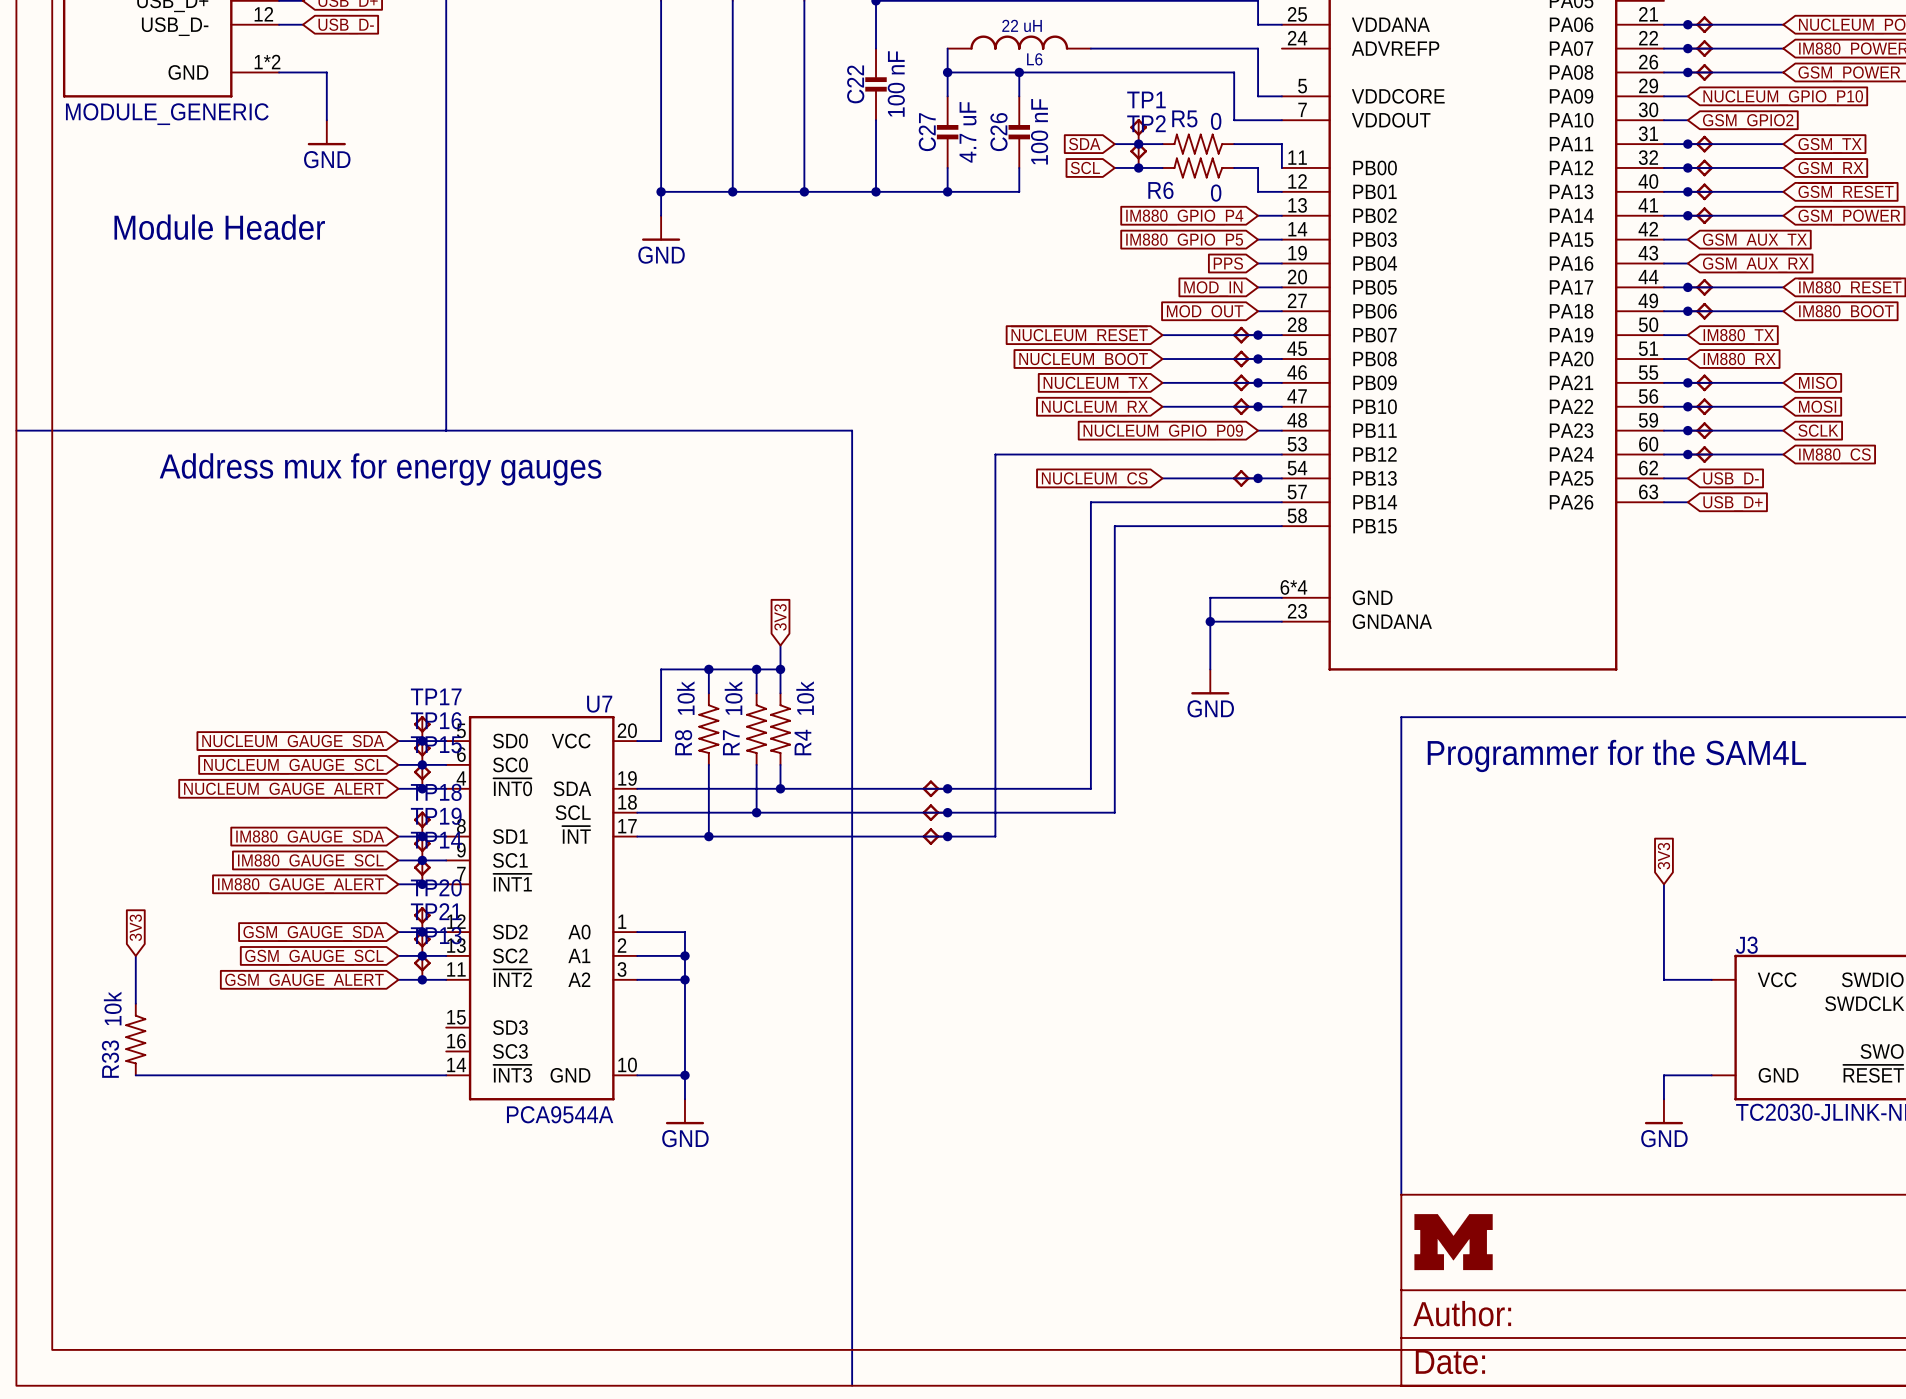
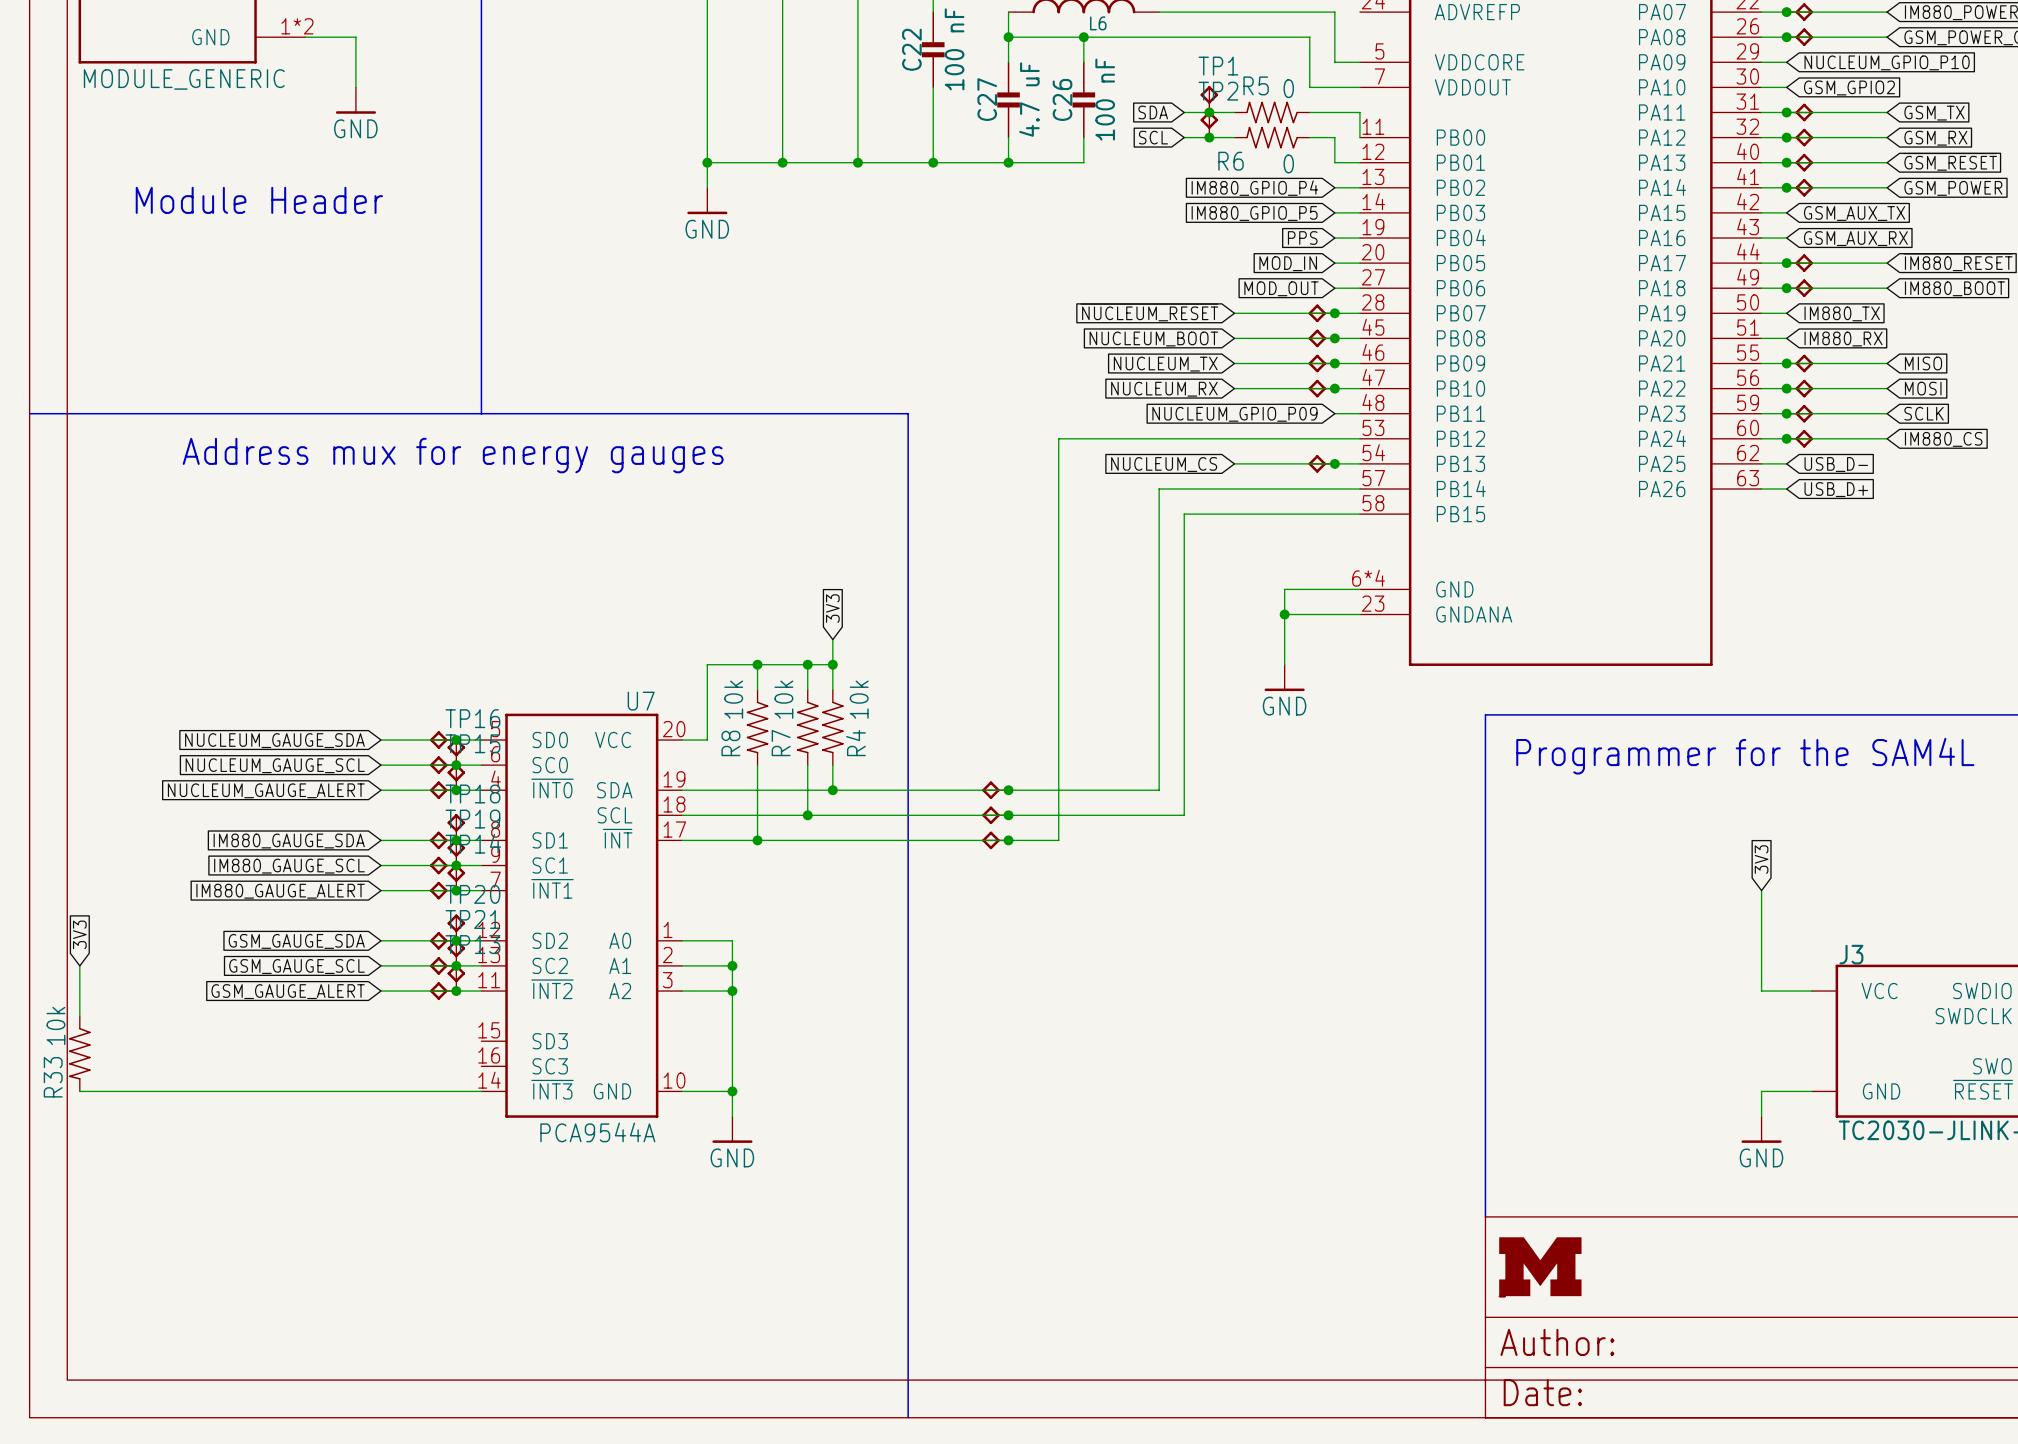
TP17: (422, 728) -> none
wire: none -> (381, 740) (431, 740)
part: none -> (443, 740)
global label position: NUCLEUM_GAUGE_SDA (293, 742) -> NUCLEUM_GAUGE_SDA (274, 740)
wire: none -> (381, 765) (431, 765)
part: none -> (443, 765)
global label position: NUCLEUM_GAUGE_SCL (293, 766) -> NUCLEUM_GAUGE_SCL (275, 765)
wire: none -> (381, 790) (431, 790)
part: none -> (443, 790)
global label position: NUCLEUM_GAUGE_ALERT (283, 790) -> NUCLEUM_GAUGE_ALERT (266, 790)
wire: none -> (381, 840) (431, 840)
part: none -> (443, 840)
global label position: IM880_GAUGE_SDA (310, 838) -> IM880_GAUGE_SDA (289, 841)
wire: none -> (381, 865) (431, 865)
part: none -> (443, 865)
global label position: IM880_GAUGE_SCL (310, 862) -> IM880_GAUGE_SCL (289, 866)
wire: none -> (381, 890) (431, 890)
part: none -> (443, 890)
global label position: IM880_GAUGE_ALERT (300, 885) -> IM880_GAUGE_ALERT (280, 891)
global label position: 3V3 (135, 927) -> 3V3 (79, 934)
wire: none -> (381, 940) (431, 940)
part: none -> (443, 940)
global label position: GSM_GAUGE_SDA (313, 933) -> GSM_GAUGE_SDA (296, 941)
wire: (135, 955) (135, 1003) -> (79, 965) (79, 1016)
wire: none -> (381, 965) (431, 965)
part: none -> (443, 965)
global label position: GSM_GAUGE_SCL (314, 957) -> GSM_GAUGE_SCL (296, 966)
wire: none -> (381, 991) (431, 991)
part: none -> (443, 991)
global label position: GSM_GAUGE_ALERT (304, 981) -> GSM_GAUGE_ALERT (288, 991)
R33 position: (135, 1039) -> (79, 1053)
wire: none -> (79, 1091) (155, 1091)

